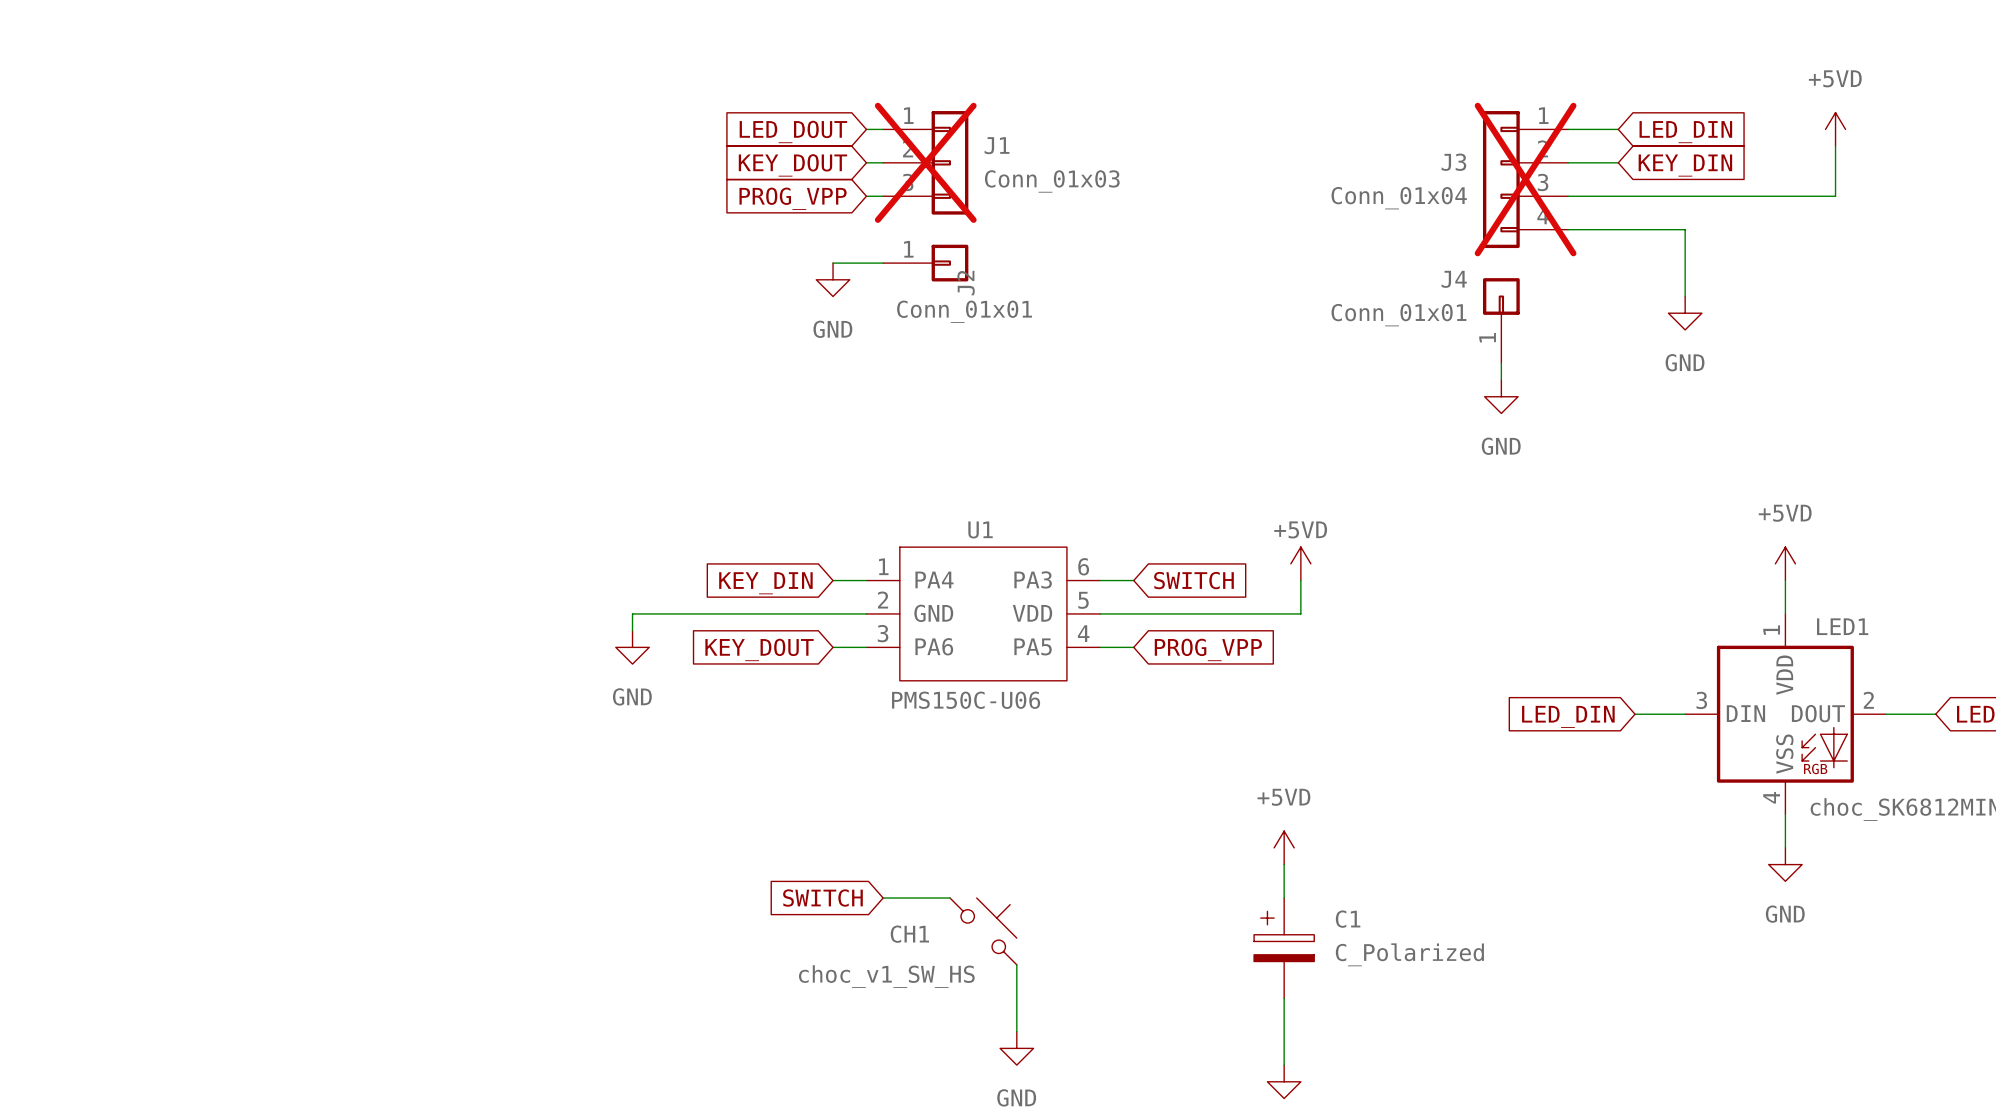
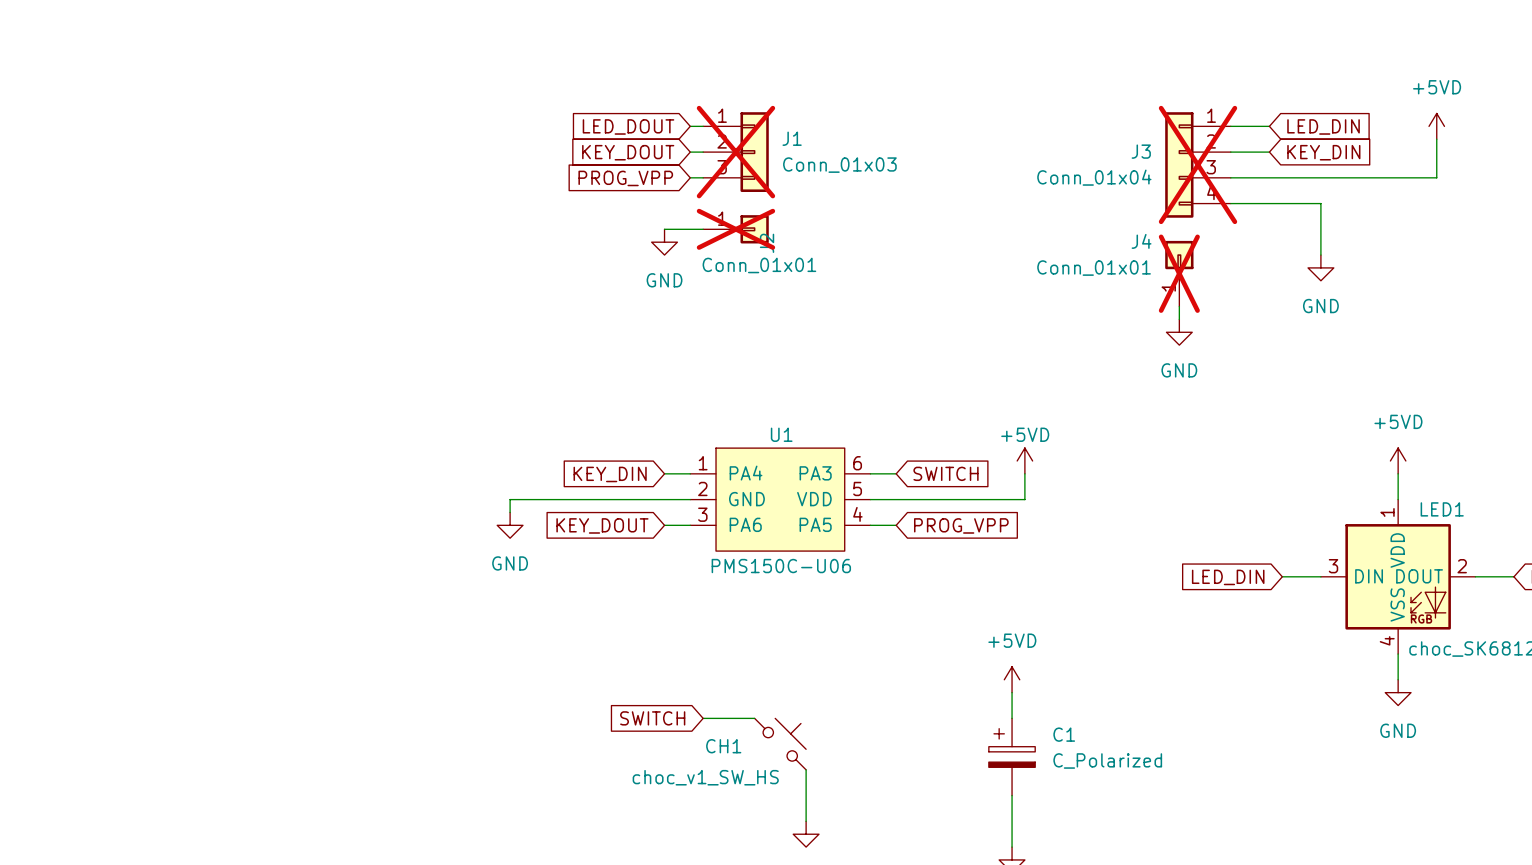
J2 do-not-place cross: none -> (735, 229)
J4 do-not-place cross: none -> (1179, 273)

